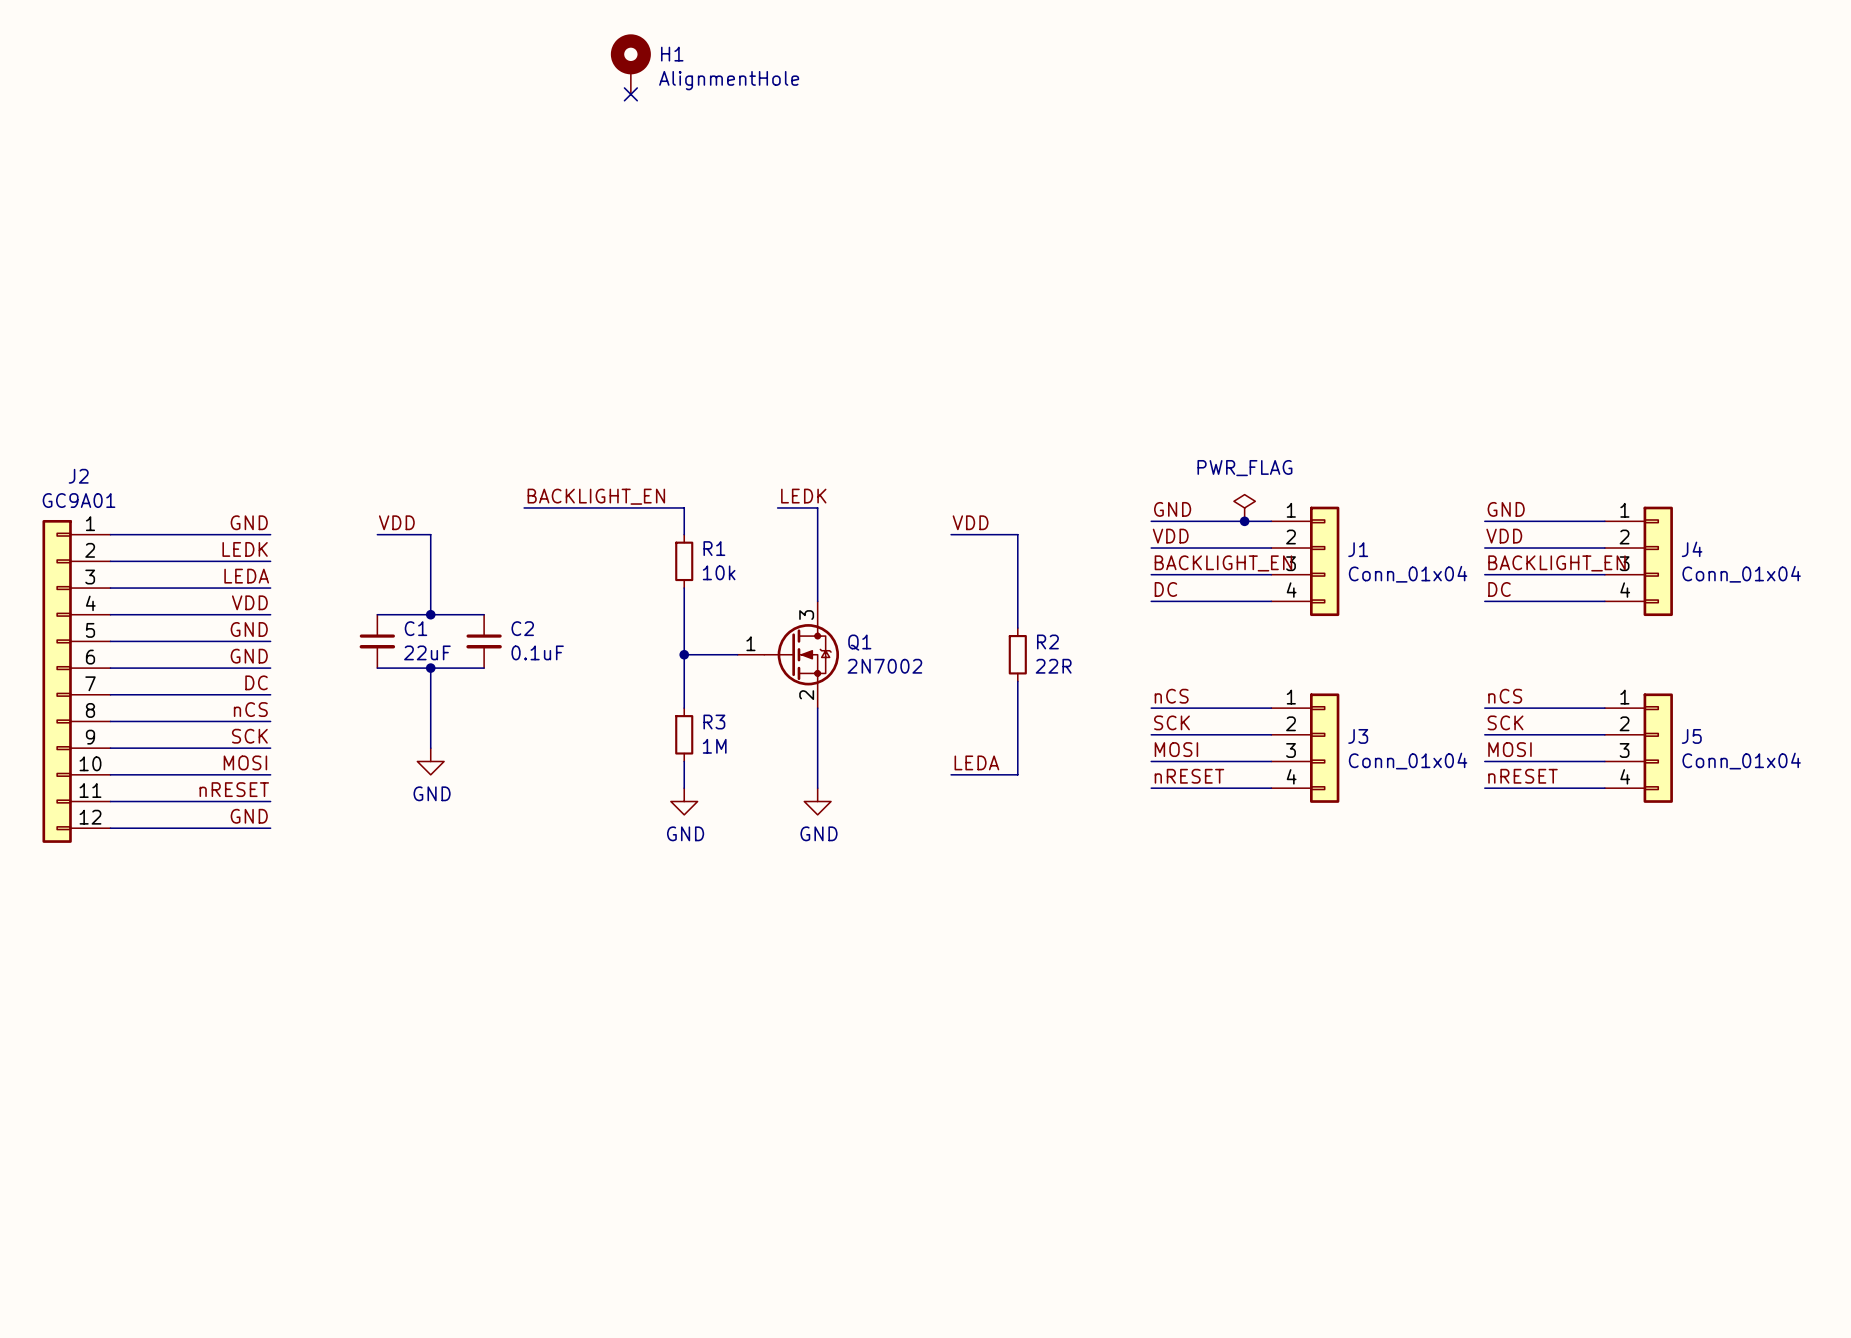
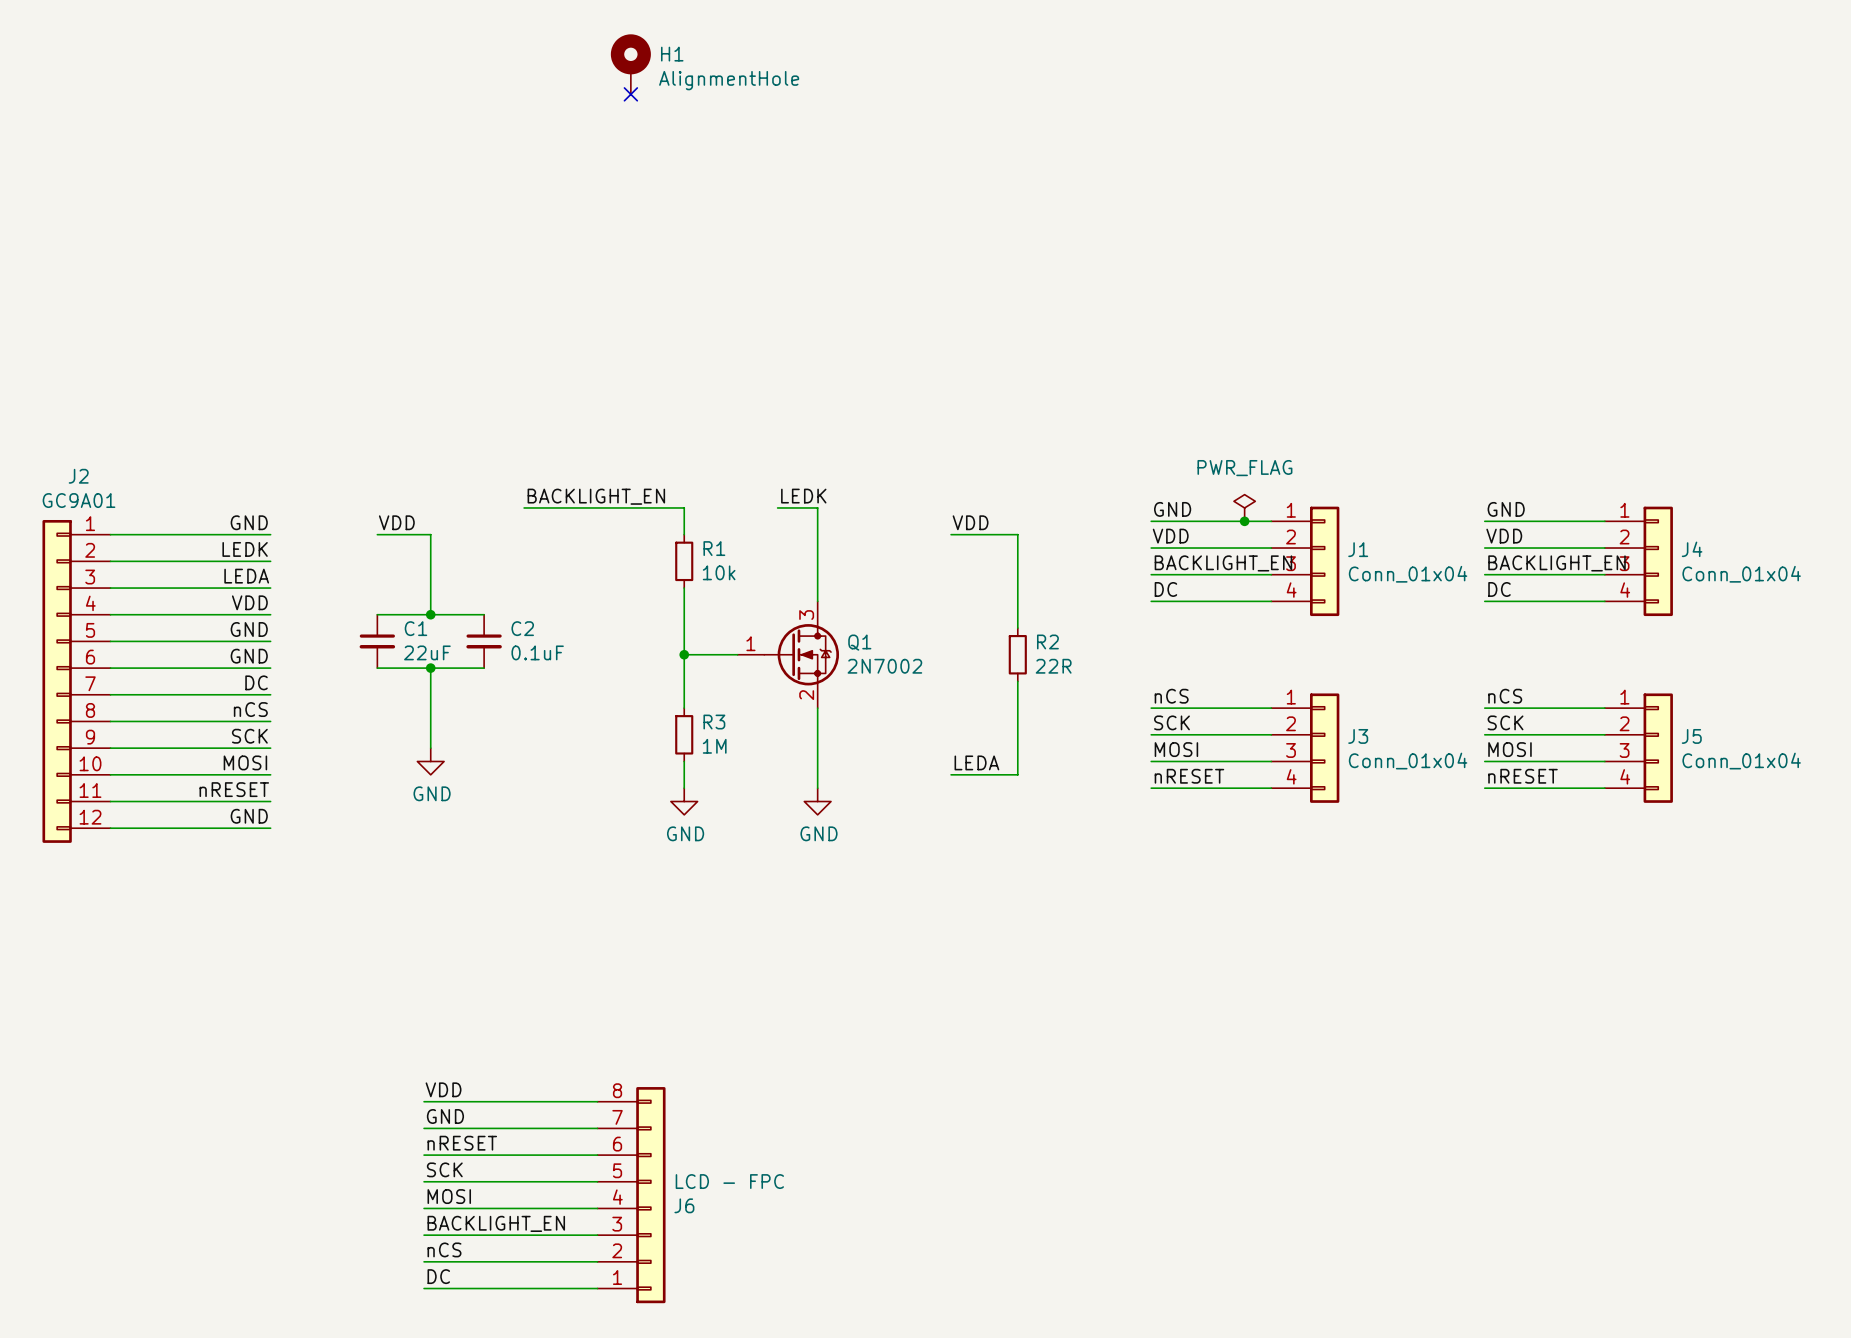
label: none -> VDD (443, 1089)
wire: none -> (424, 1101) (597, 1101)
label: none -> GND (445, 1116)
wire: none -> (424, 1128) (597, 1128)
label: none -> nRESET (462, 1143)
wire: none -> (424, 1155) (597, 1155)
label: none -> SCK (444, 1169)
wire: none -> (424, 1181) (597, 1181)
J6: none -> LCD - FPC (631, 1195)
label: none -> MOSI (449, 1196)
wire: none -> (424, 1208) (597, 1208)
label: none -> BACKLIGHT_EN (496, 1223)
wire: none -> (424, 1235) (597, 1235)
label: none -> nCS (444, 1249)
wire: none -> (424, 1261) (597, 1261)
label: none -> DC (438, 1276)
wire: none -> (424, 1288) (597, 1288)

